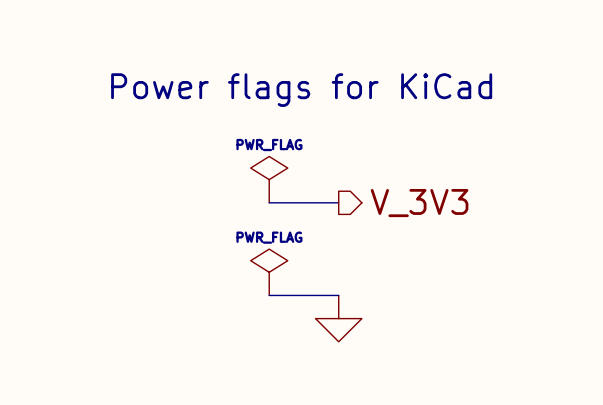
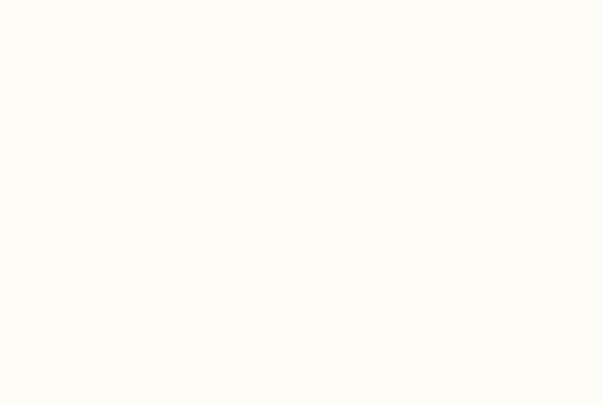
text: Power flags for KiCad (301, 90) -> none
power symbol: PWR_FLAG (269, 179) -> none
wire: (269, 202) (338, 202) -> none
hierarchical label: V_3V3 (419, 203) -> none
power symbol: PWR_FLAG (269, 272) -> none
wire: (269, 295) (338, 295) -> none
power symbol: (338, 318) -> none

